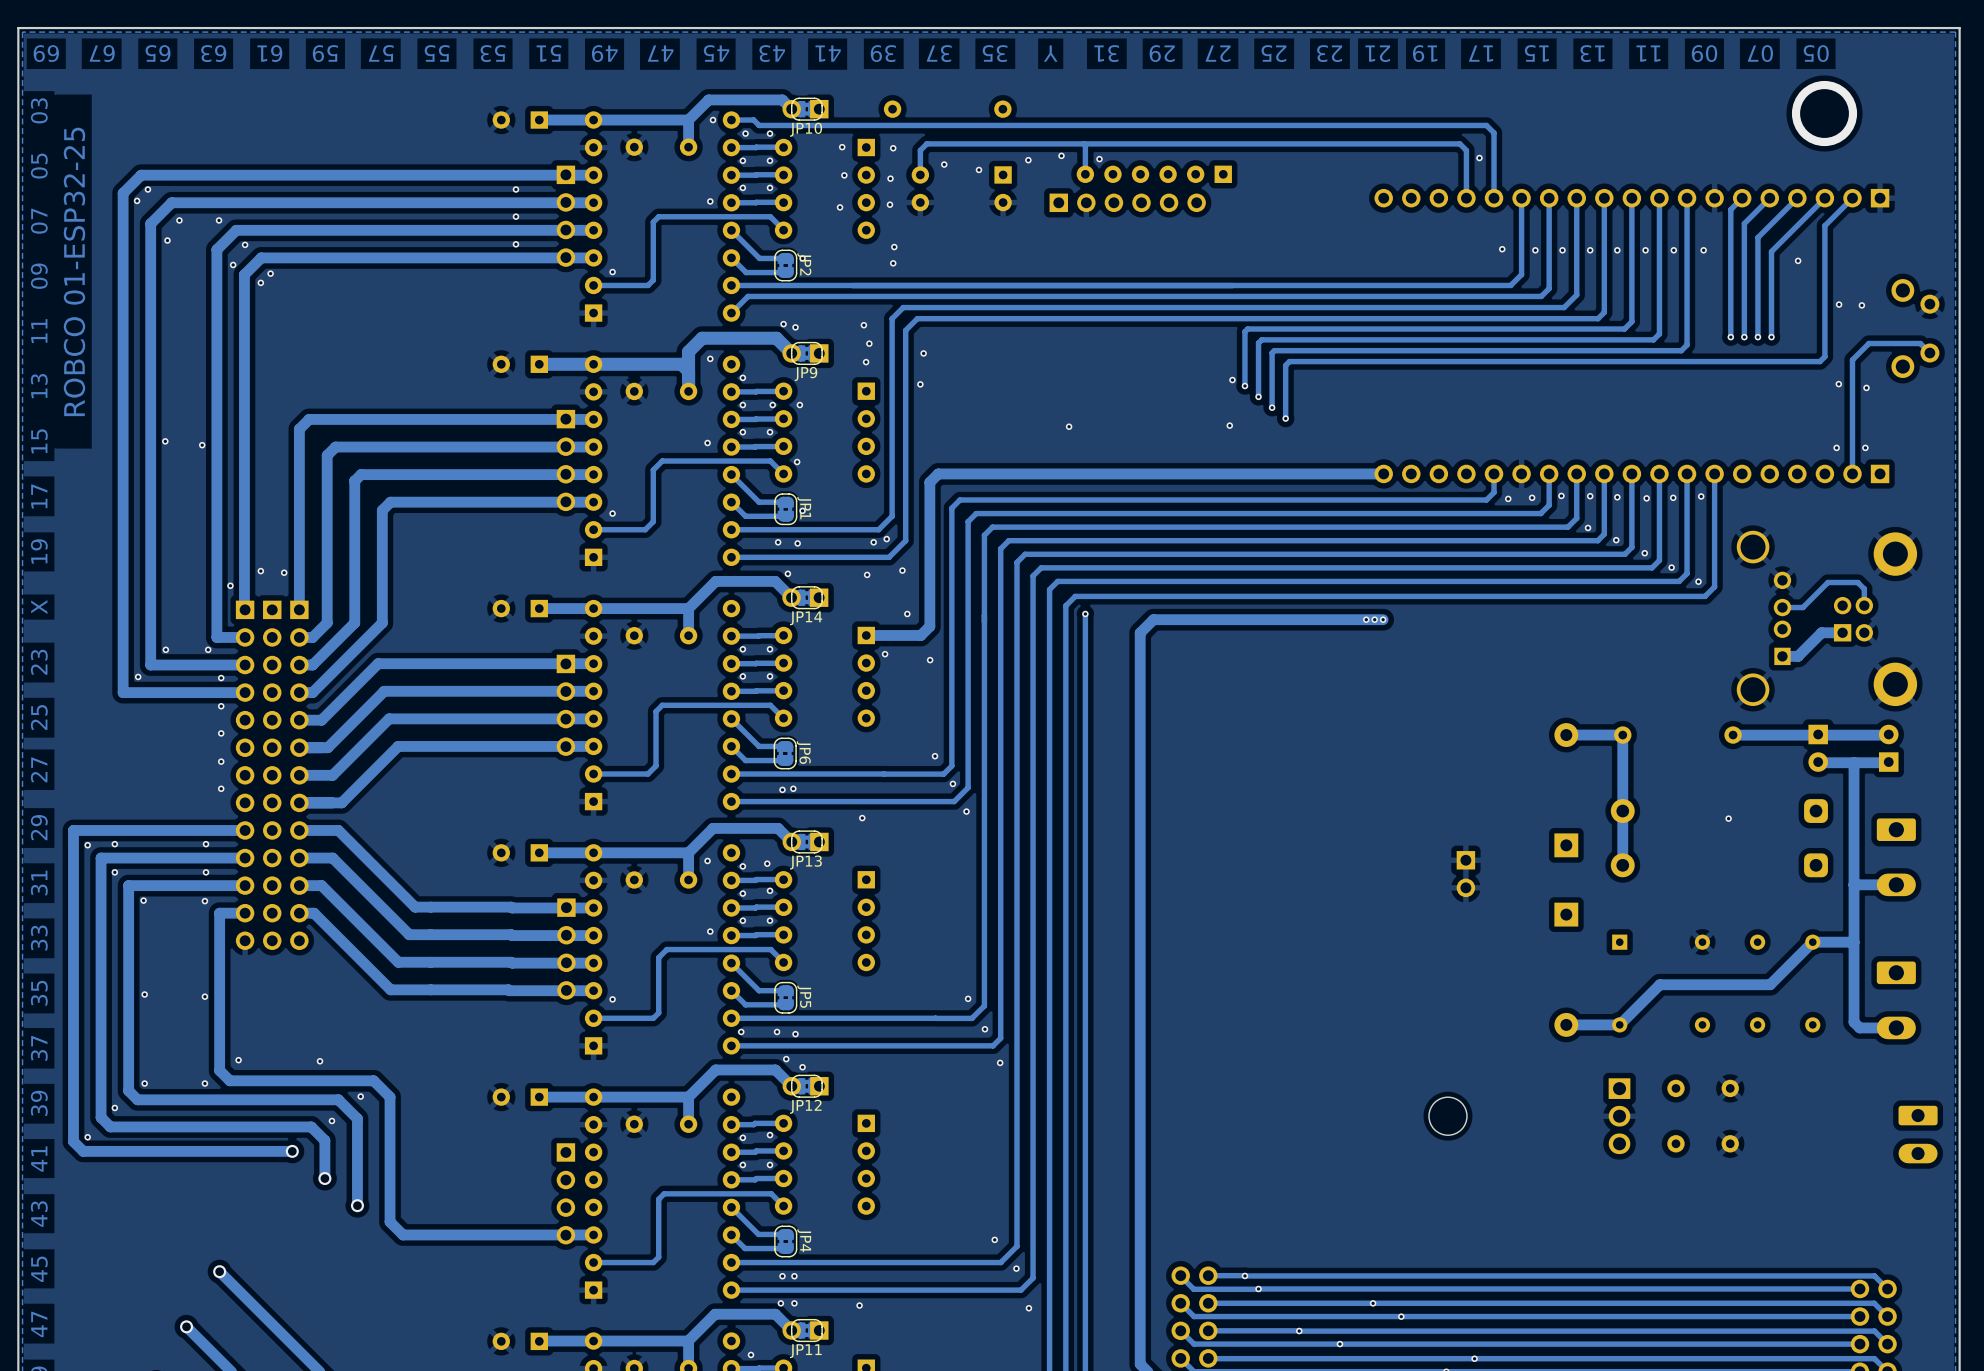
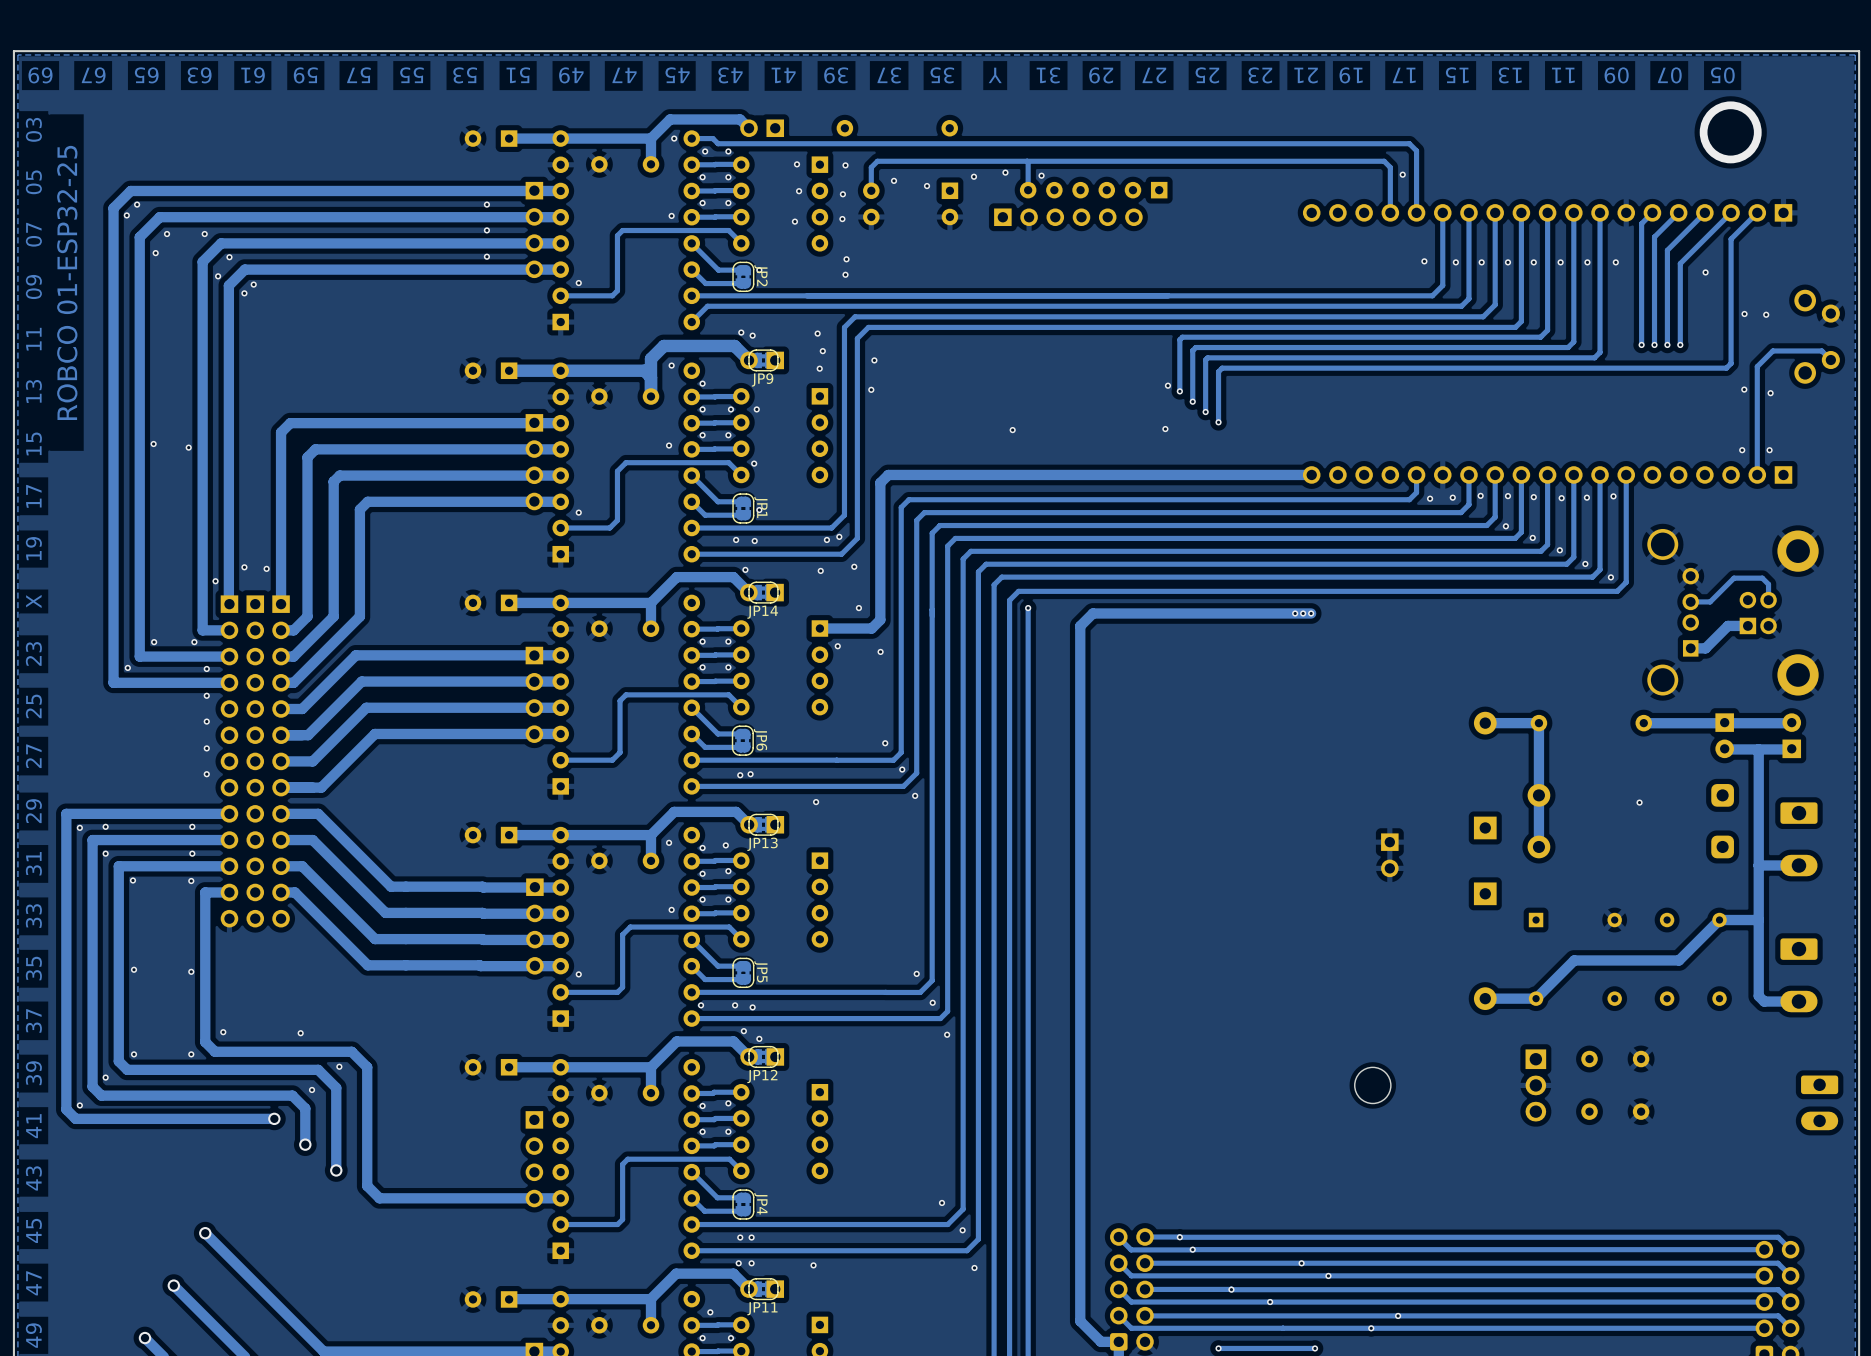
JP10: (806, 109) -> none

